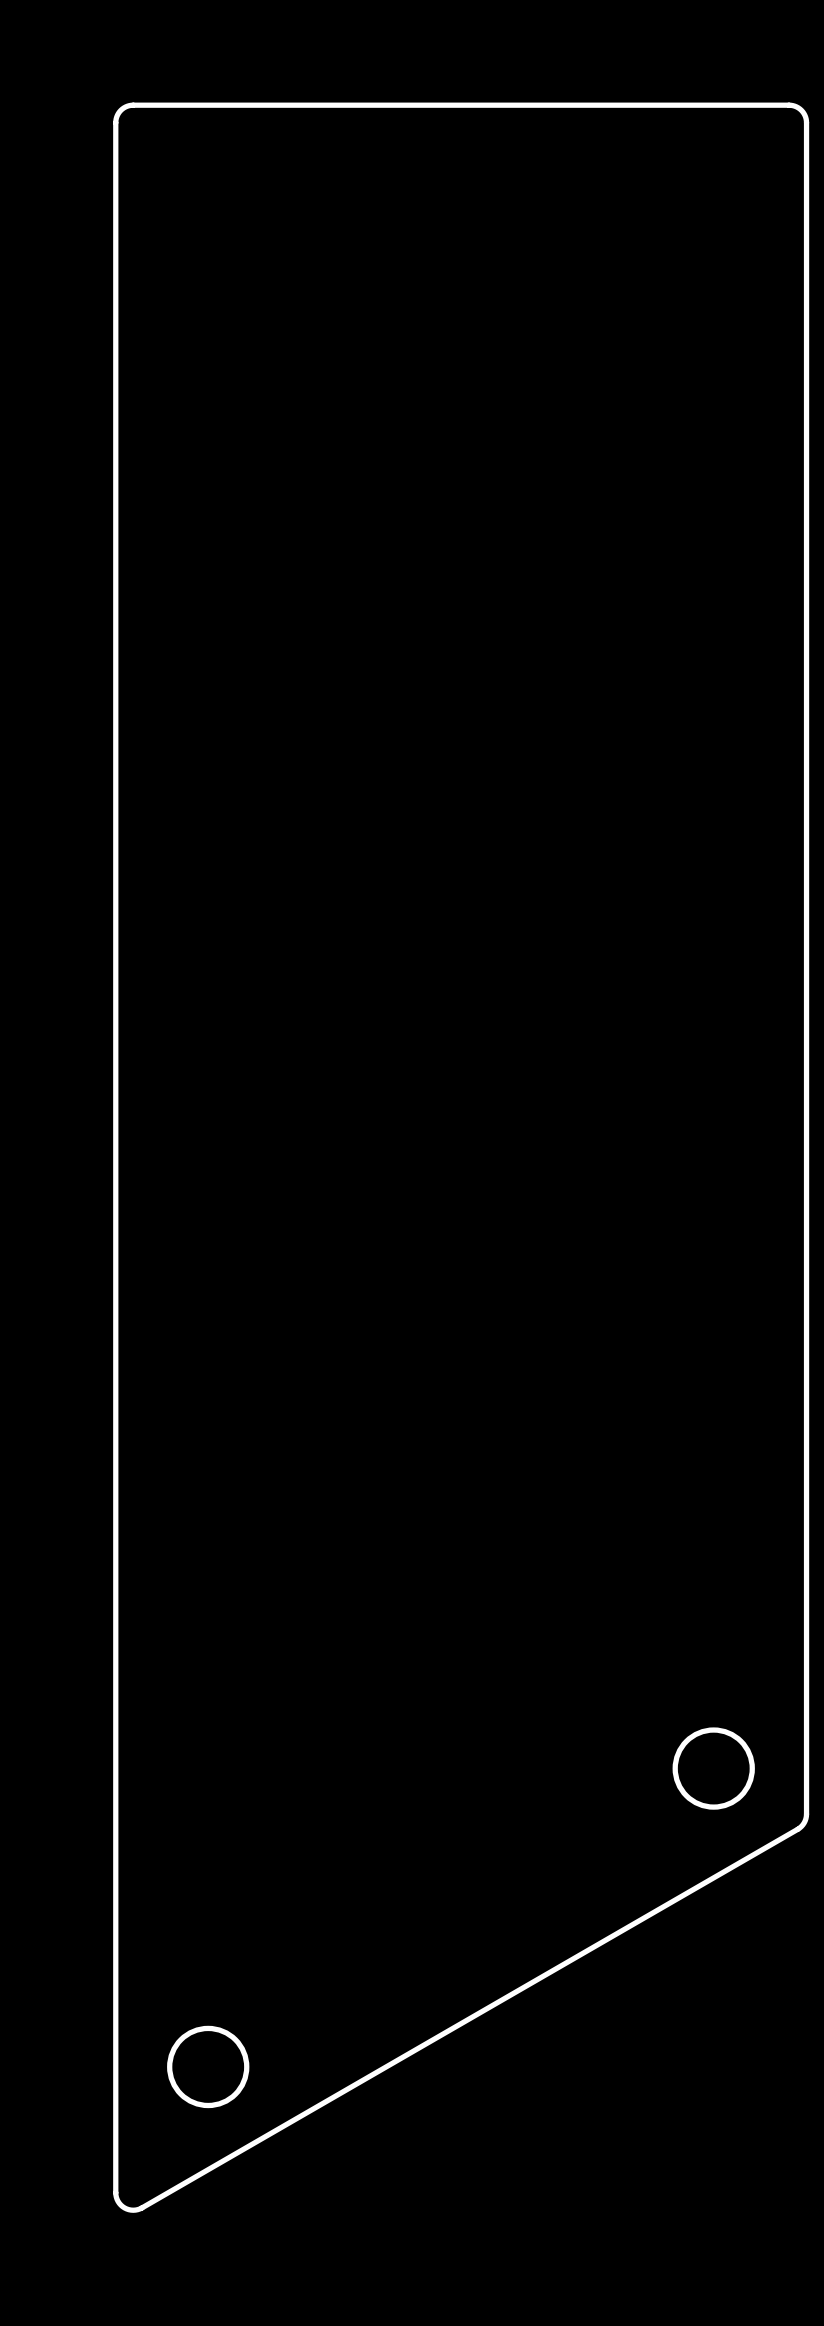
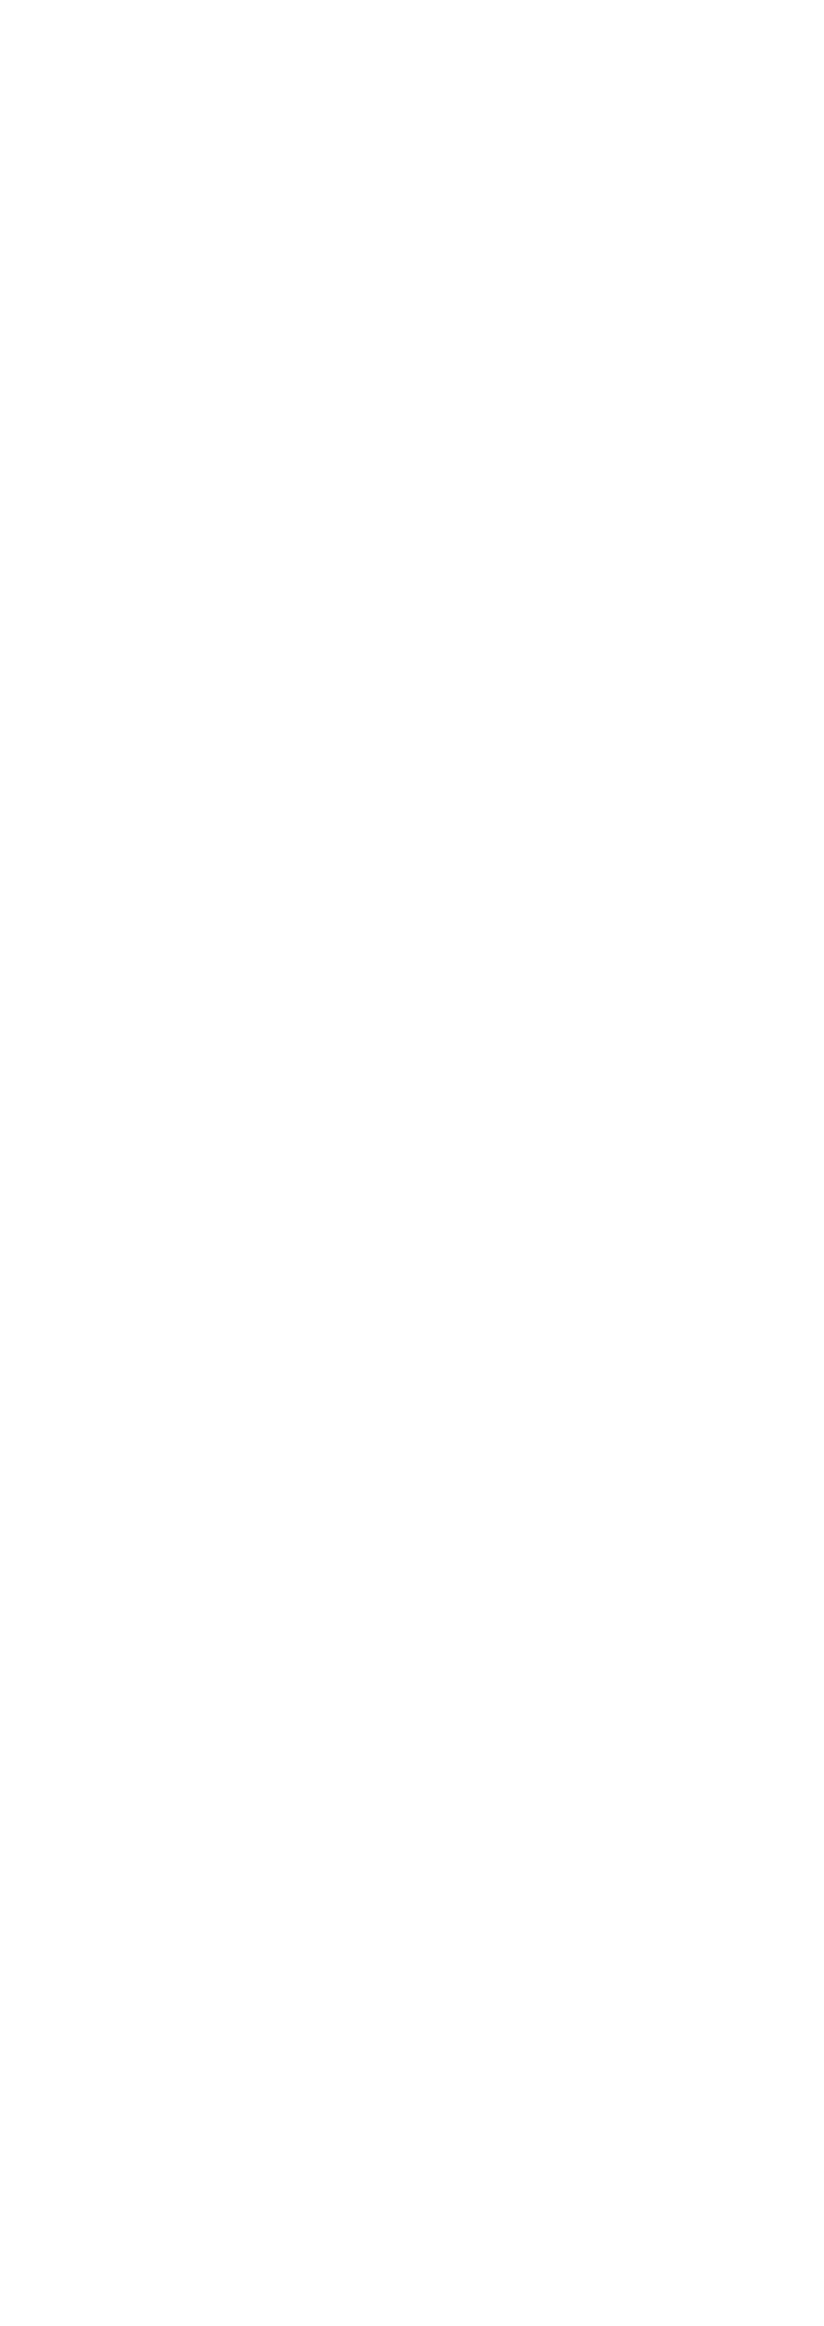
board edge: (789, 105) (133, 105) (122, 109) (116, 116) (115, 2192) (119, 2203) (128, 2209) (142, 2207) (797, 1829) (805, 1818) (806, 122) (801, 110) (789, 105) -> none
round board edge: [672, 1727, 755, 1810] -> none
round board edge: [167, 2025, 250, 2109] -> none

